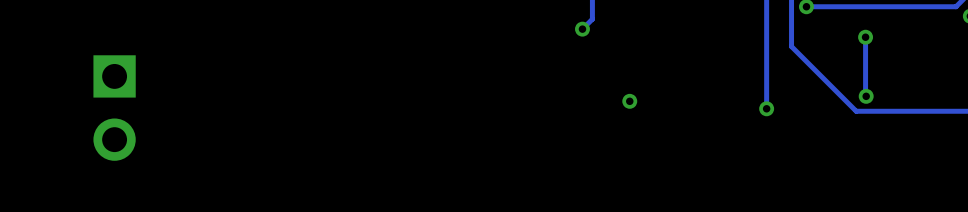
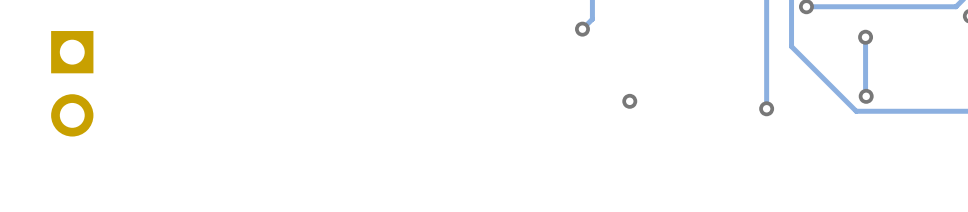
part position: (114, 108) -> (72, 83)

